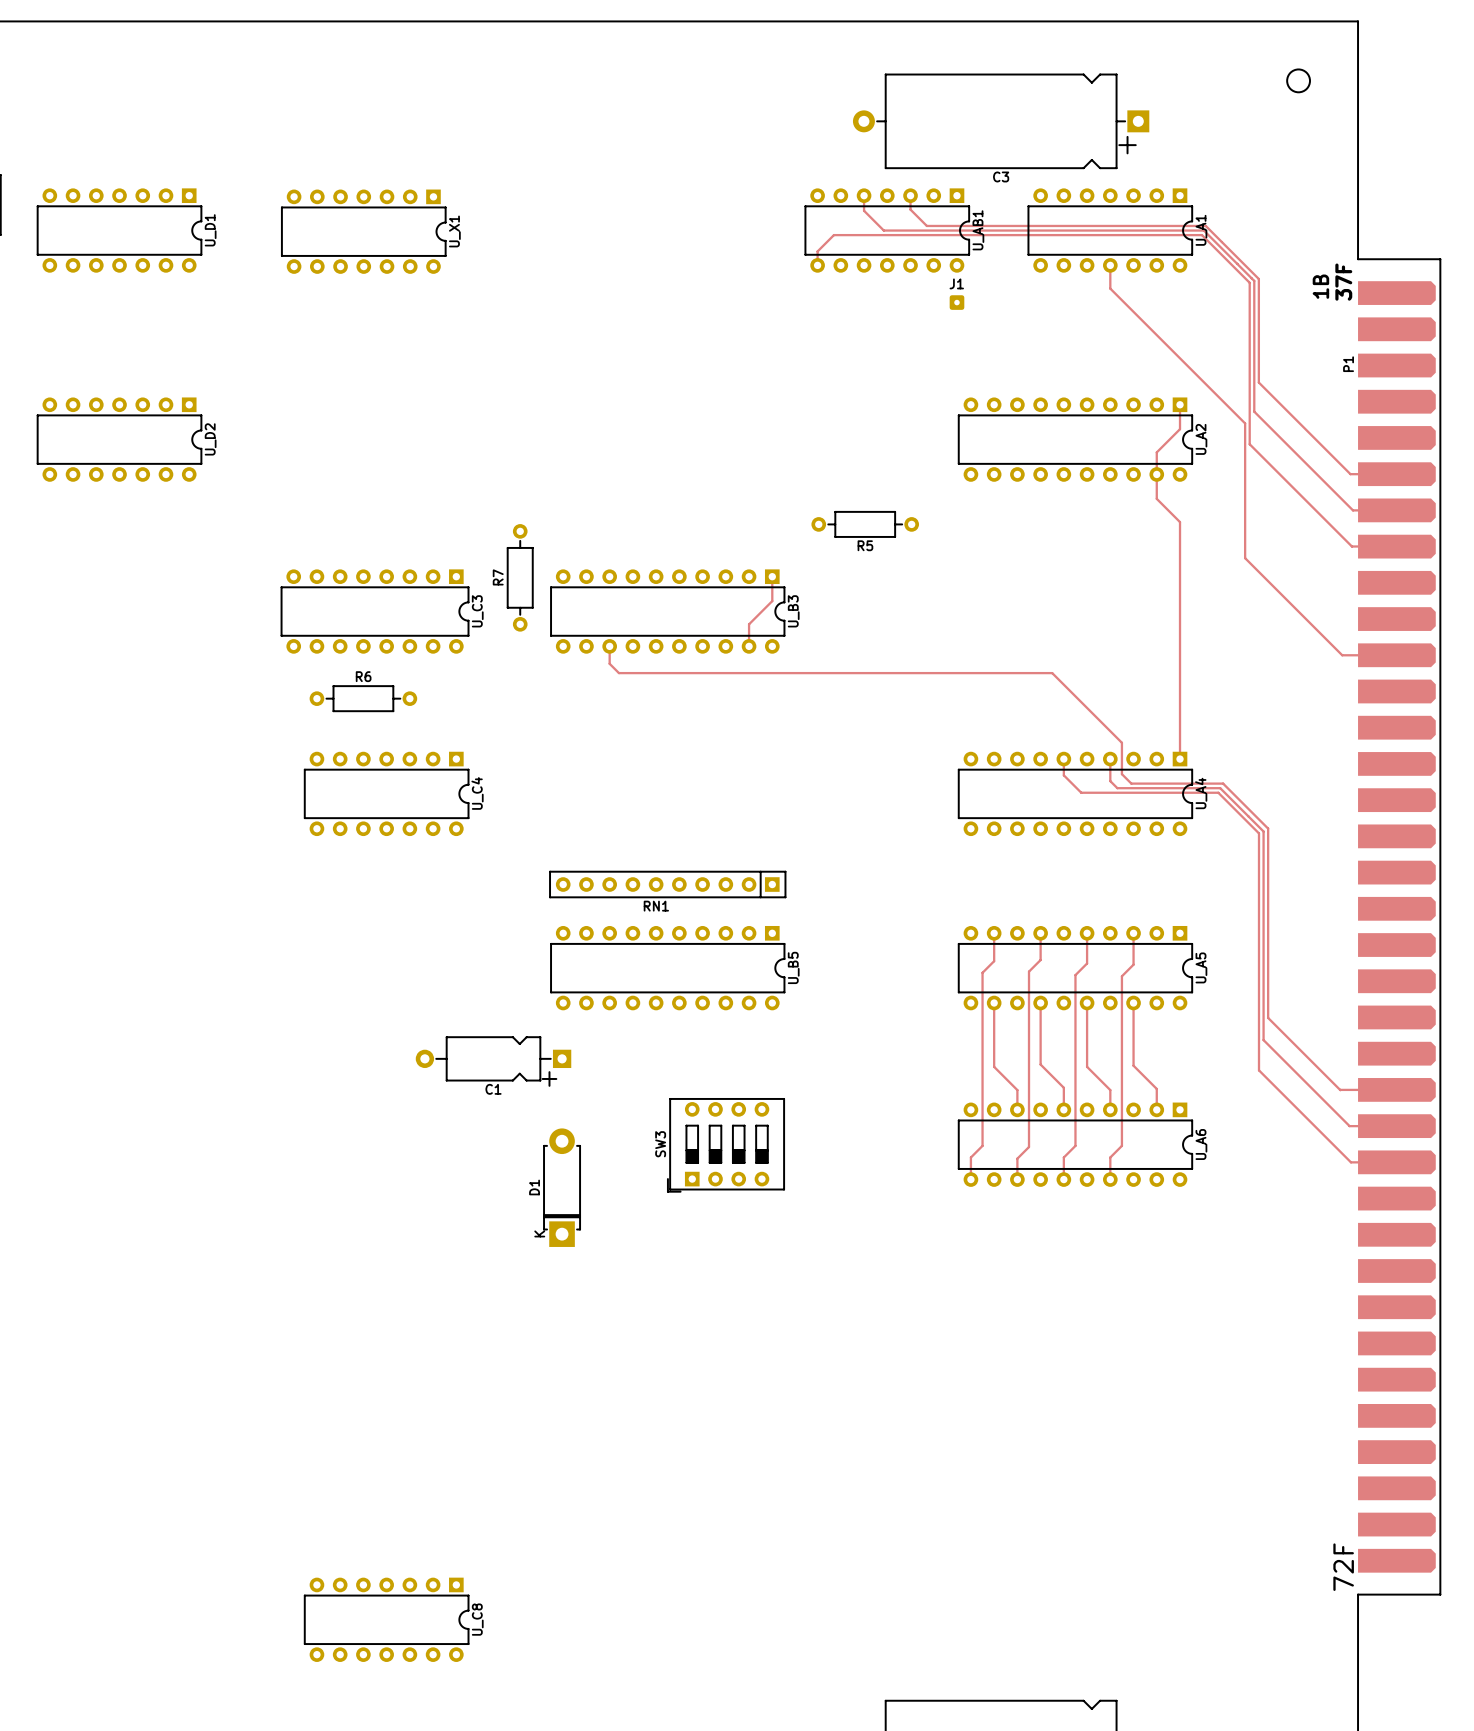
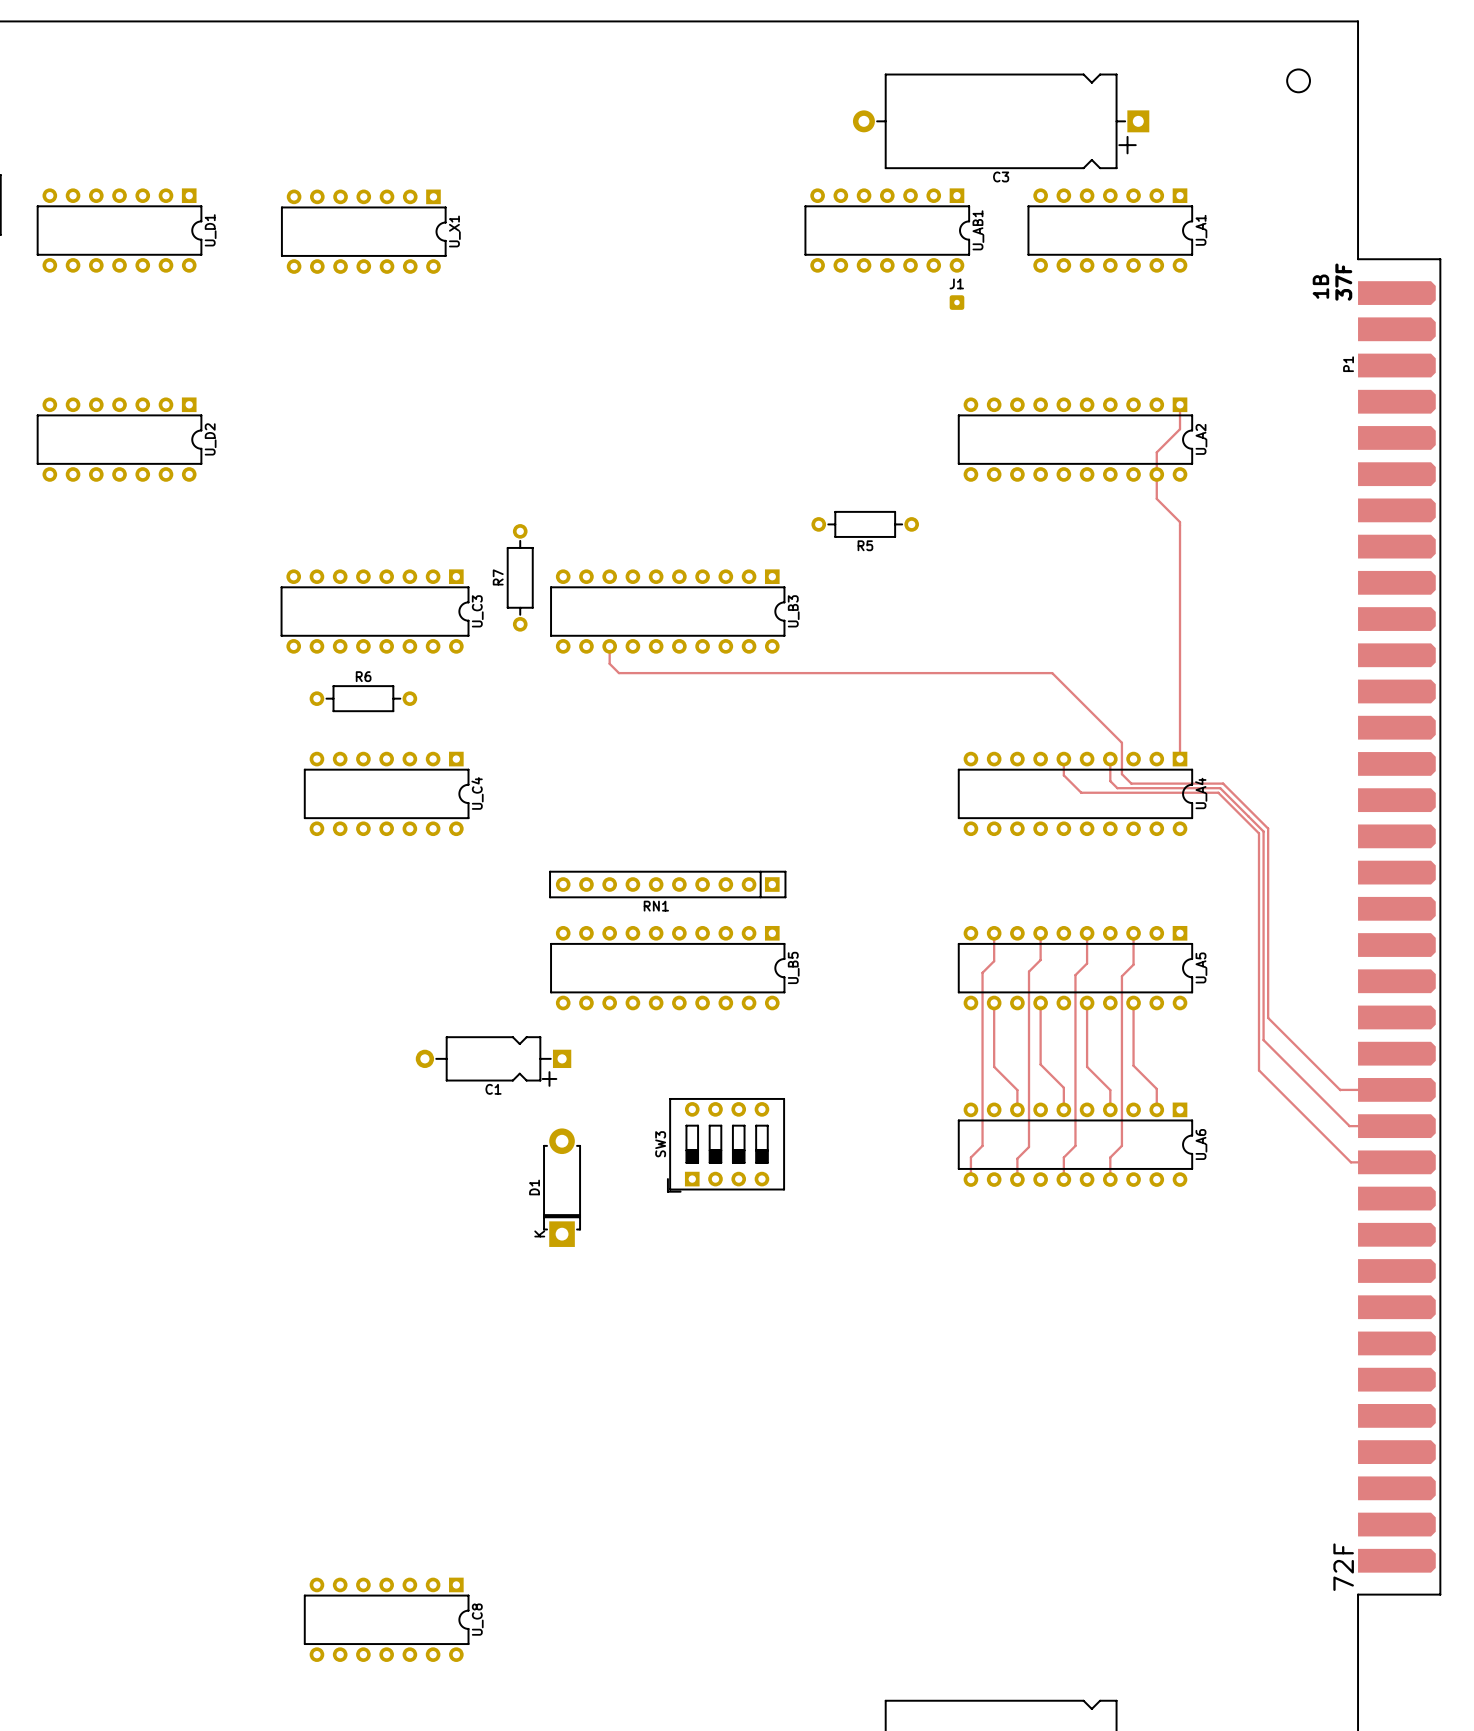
track: (864, 195) (864, 210) (883, 230) (1203, 230) (1254, 280) (1254, 411) (1353, 510) (1378, 510) -> none
track: (910, 195) (910, 209) (926, 225) (1205, 225) (1258, 279) (1258, 382) (1350, 474) (1378, 474) -> none
track: (817, 265) (817, 251) (833, 235) (1202, 235) (1249, 282) (1249, 444) (1351, 546) (1378, 546) -> none
track: (1110, 265) (1110, 288) (1245, 423) (1245, 558) (1342, 655) (1378, 655) -> none
track: (772, 576) (772, 601) (749, 624) (749, 646) -> none

